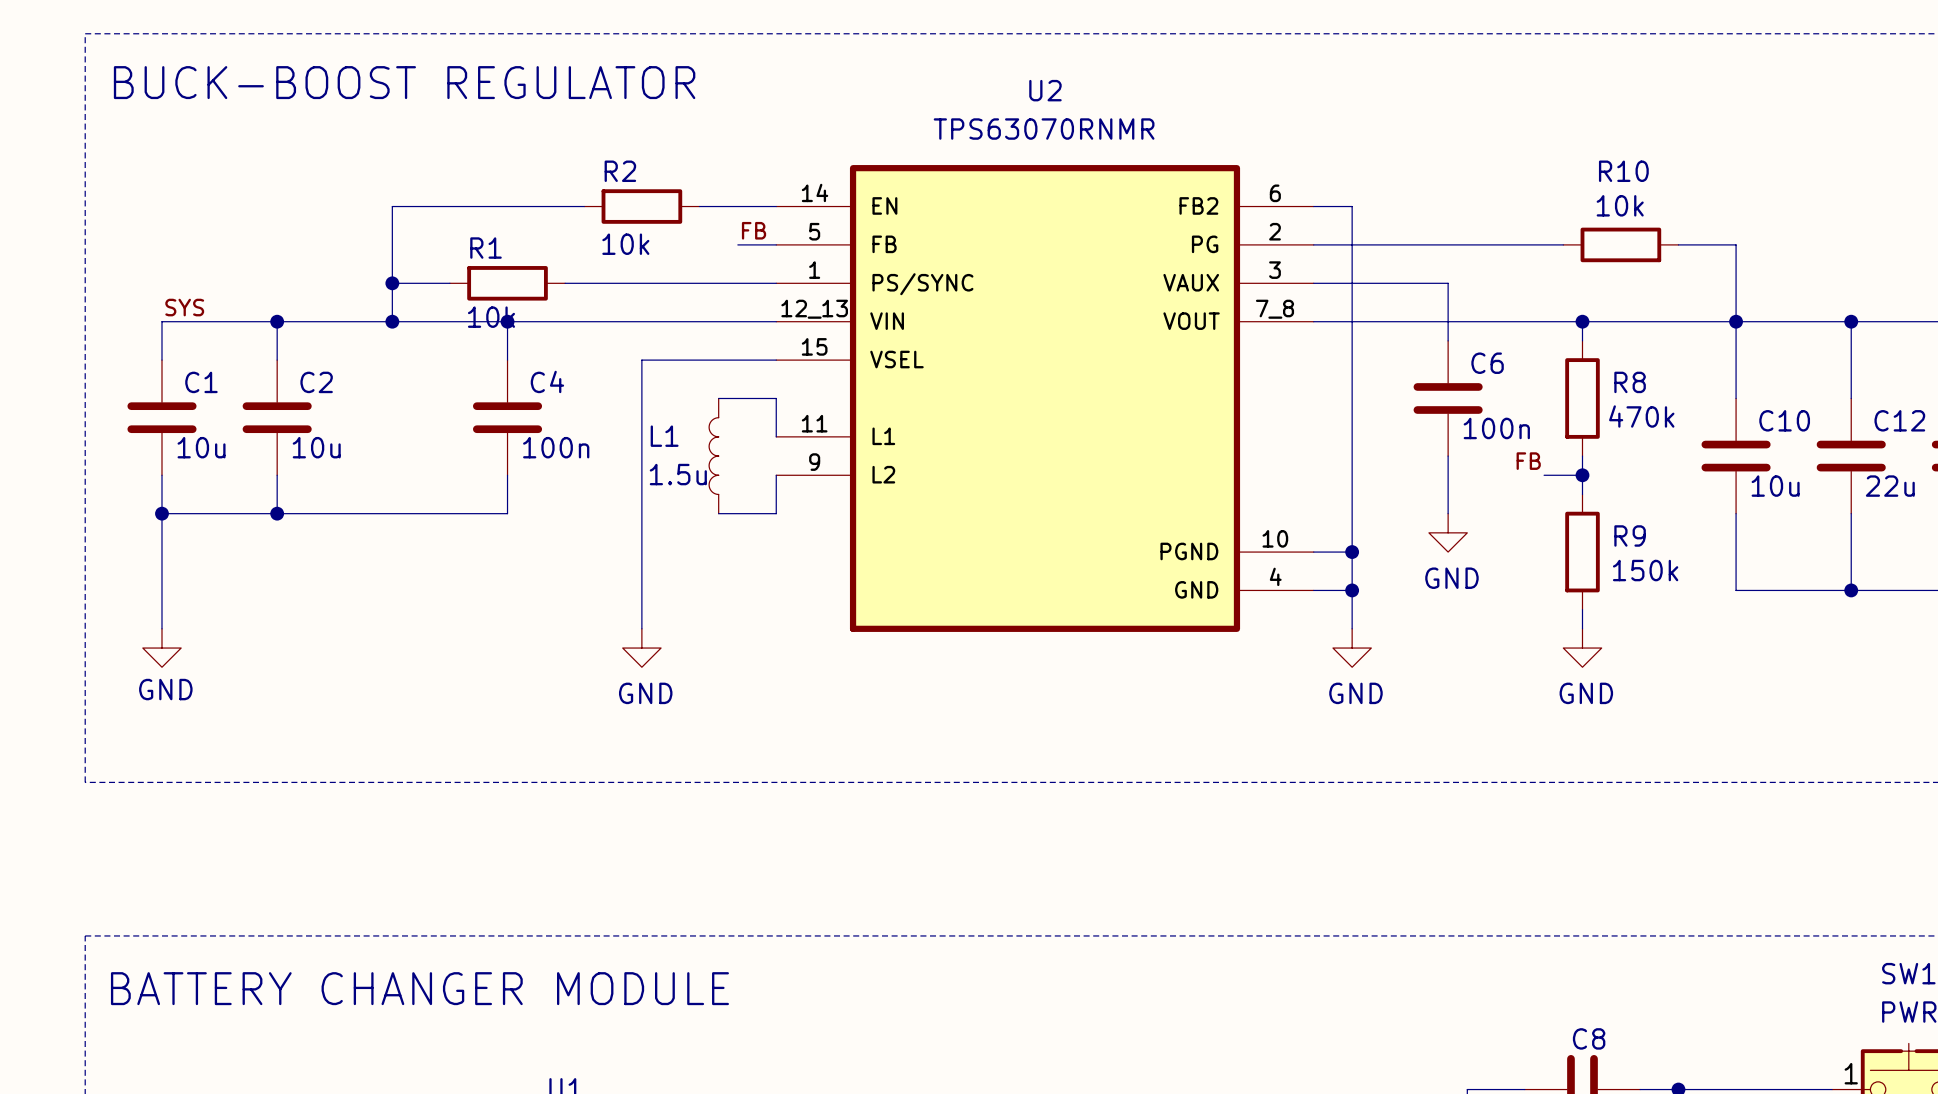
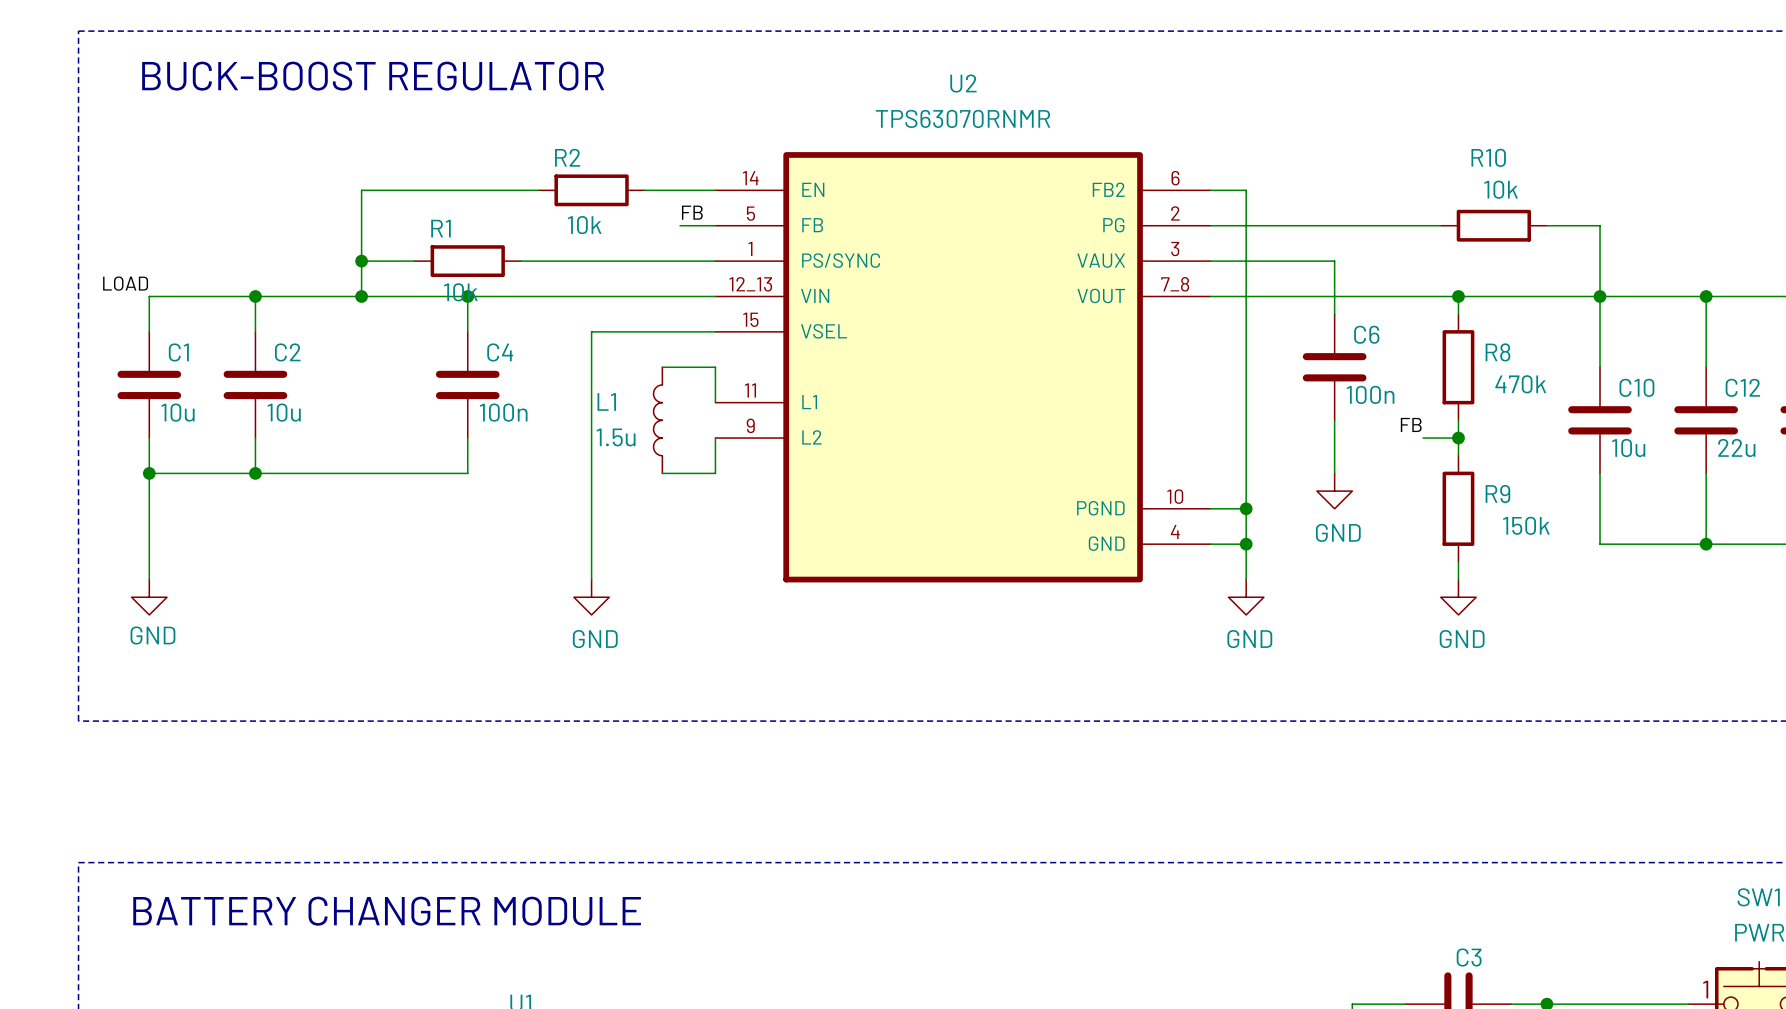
label: SYS (184, 307) -> LOAD (125, 283)
C8 name: C8 (1589, 1038) -> C3 (1469, 957)

